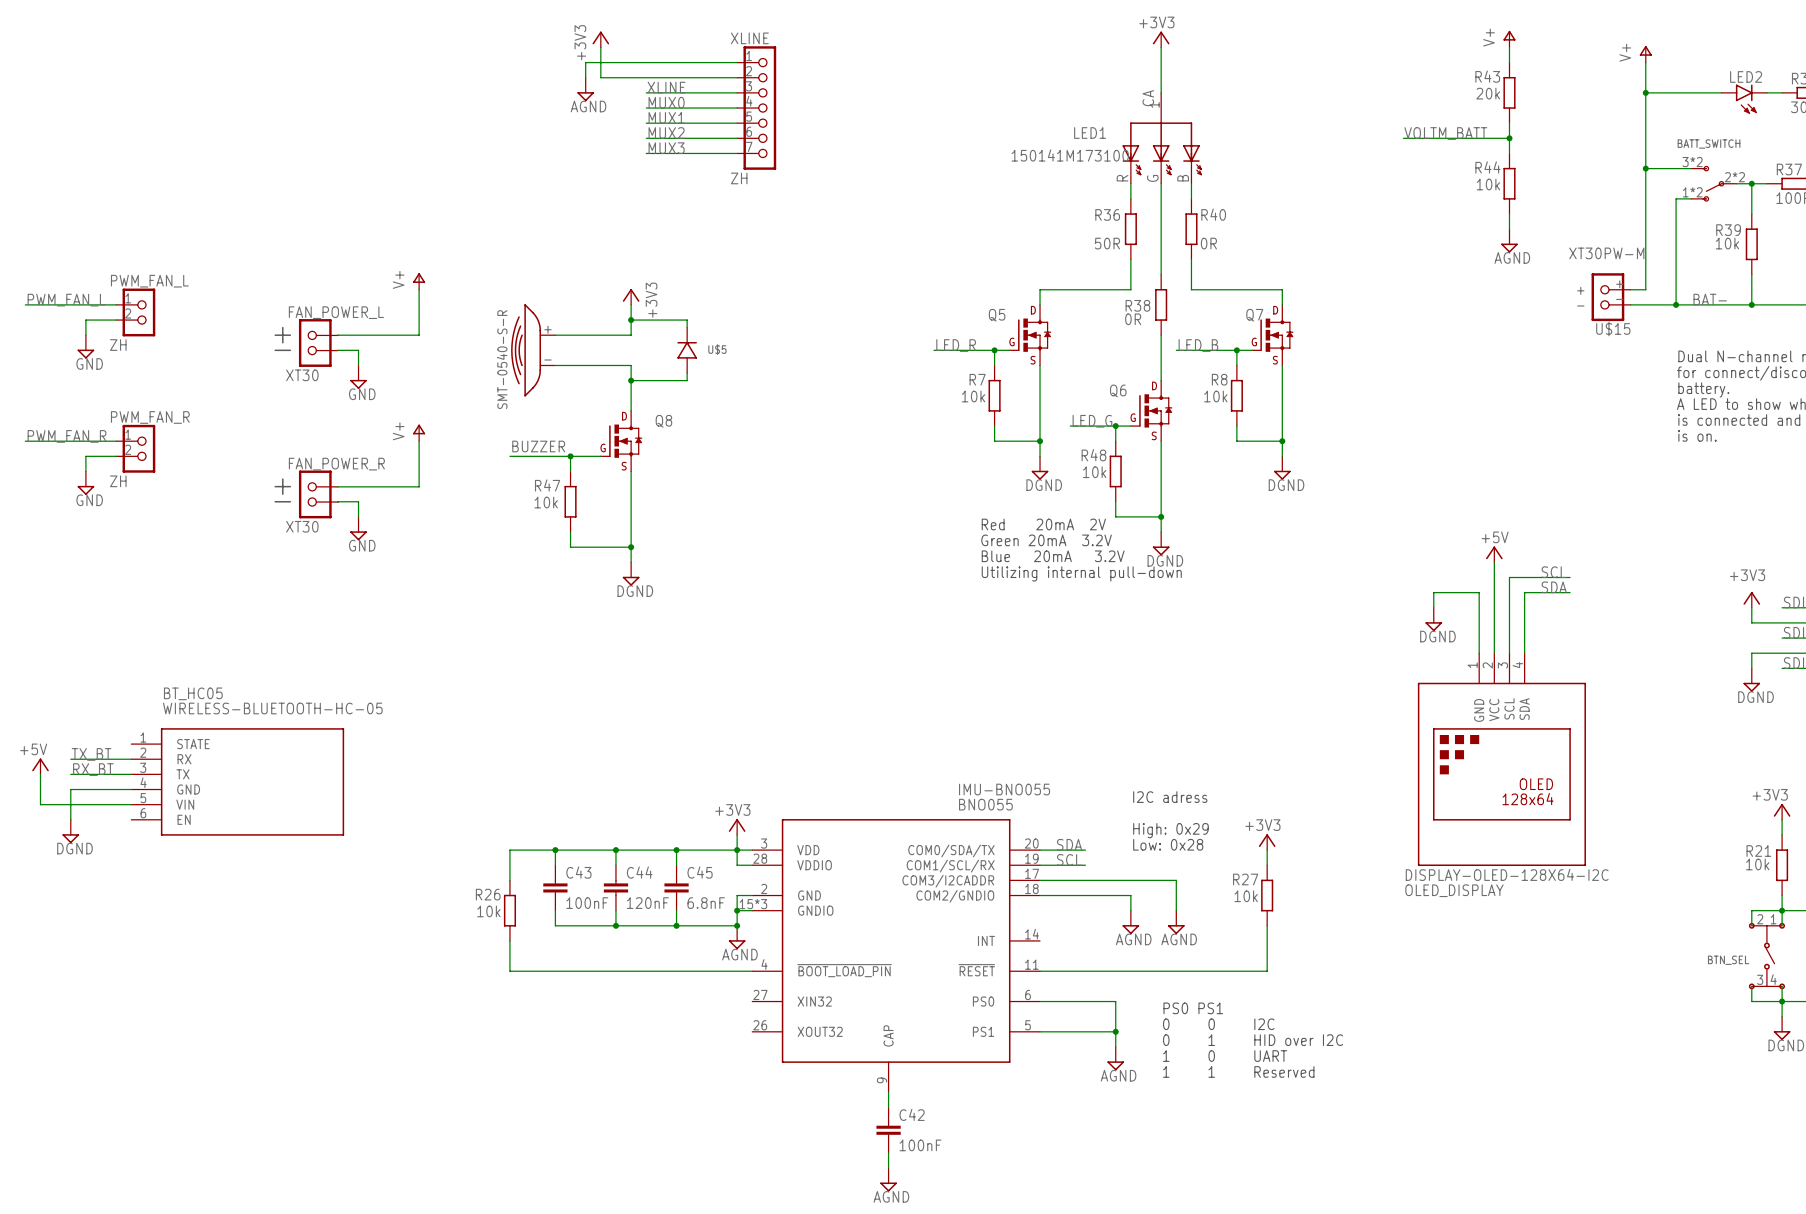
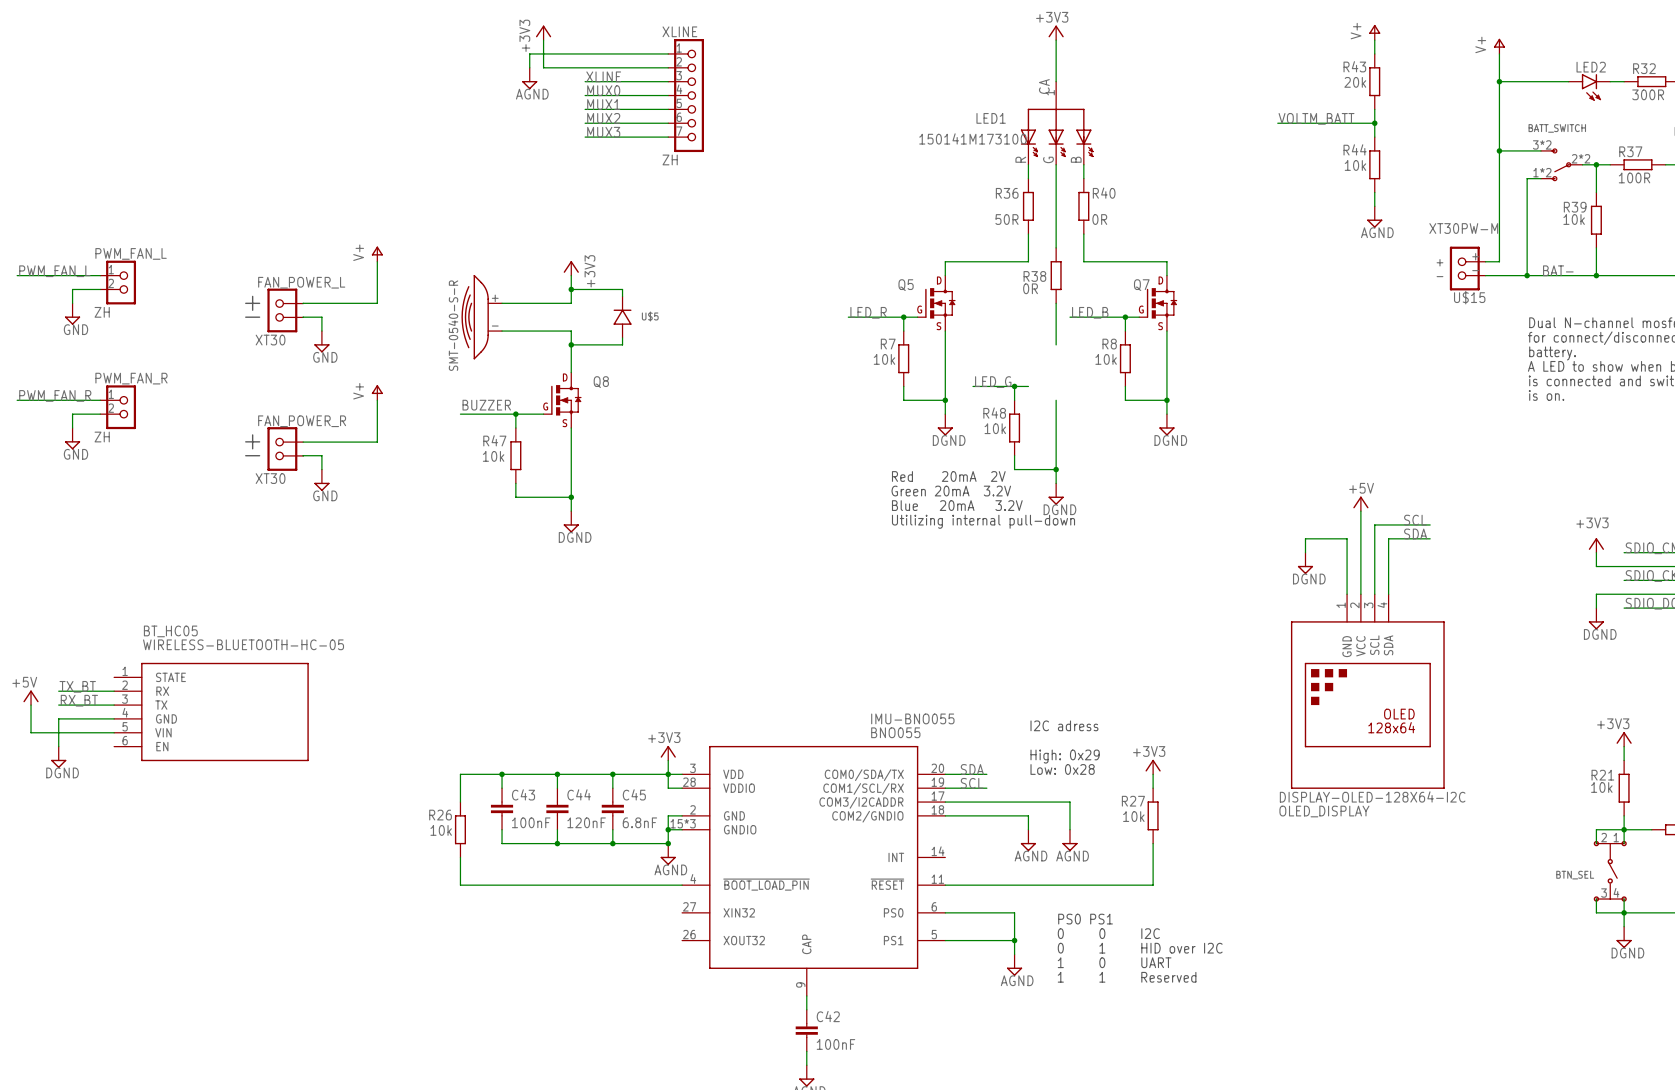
Q6: (1151, 410) -> none

